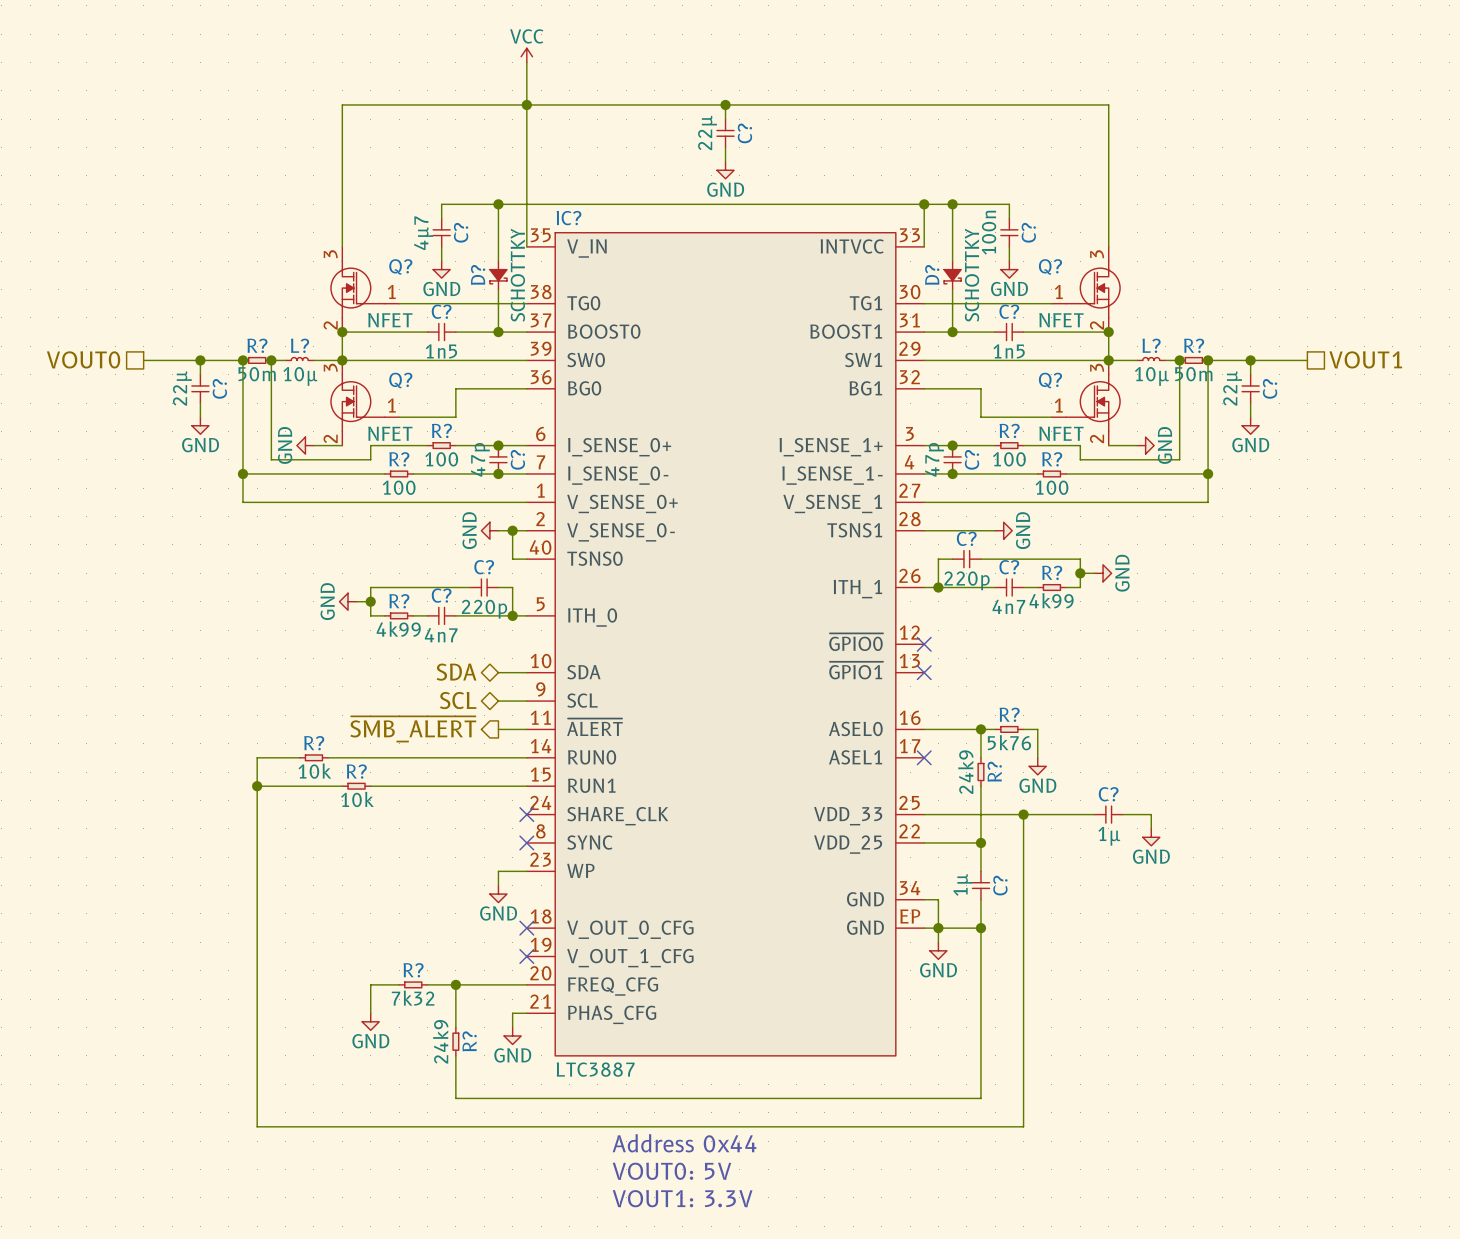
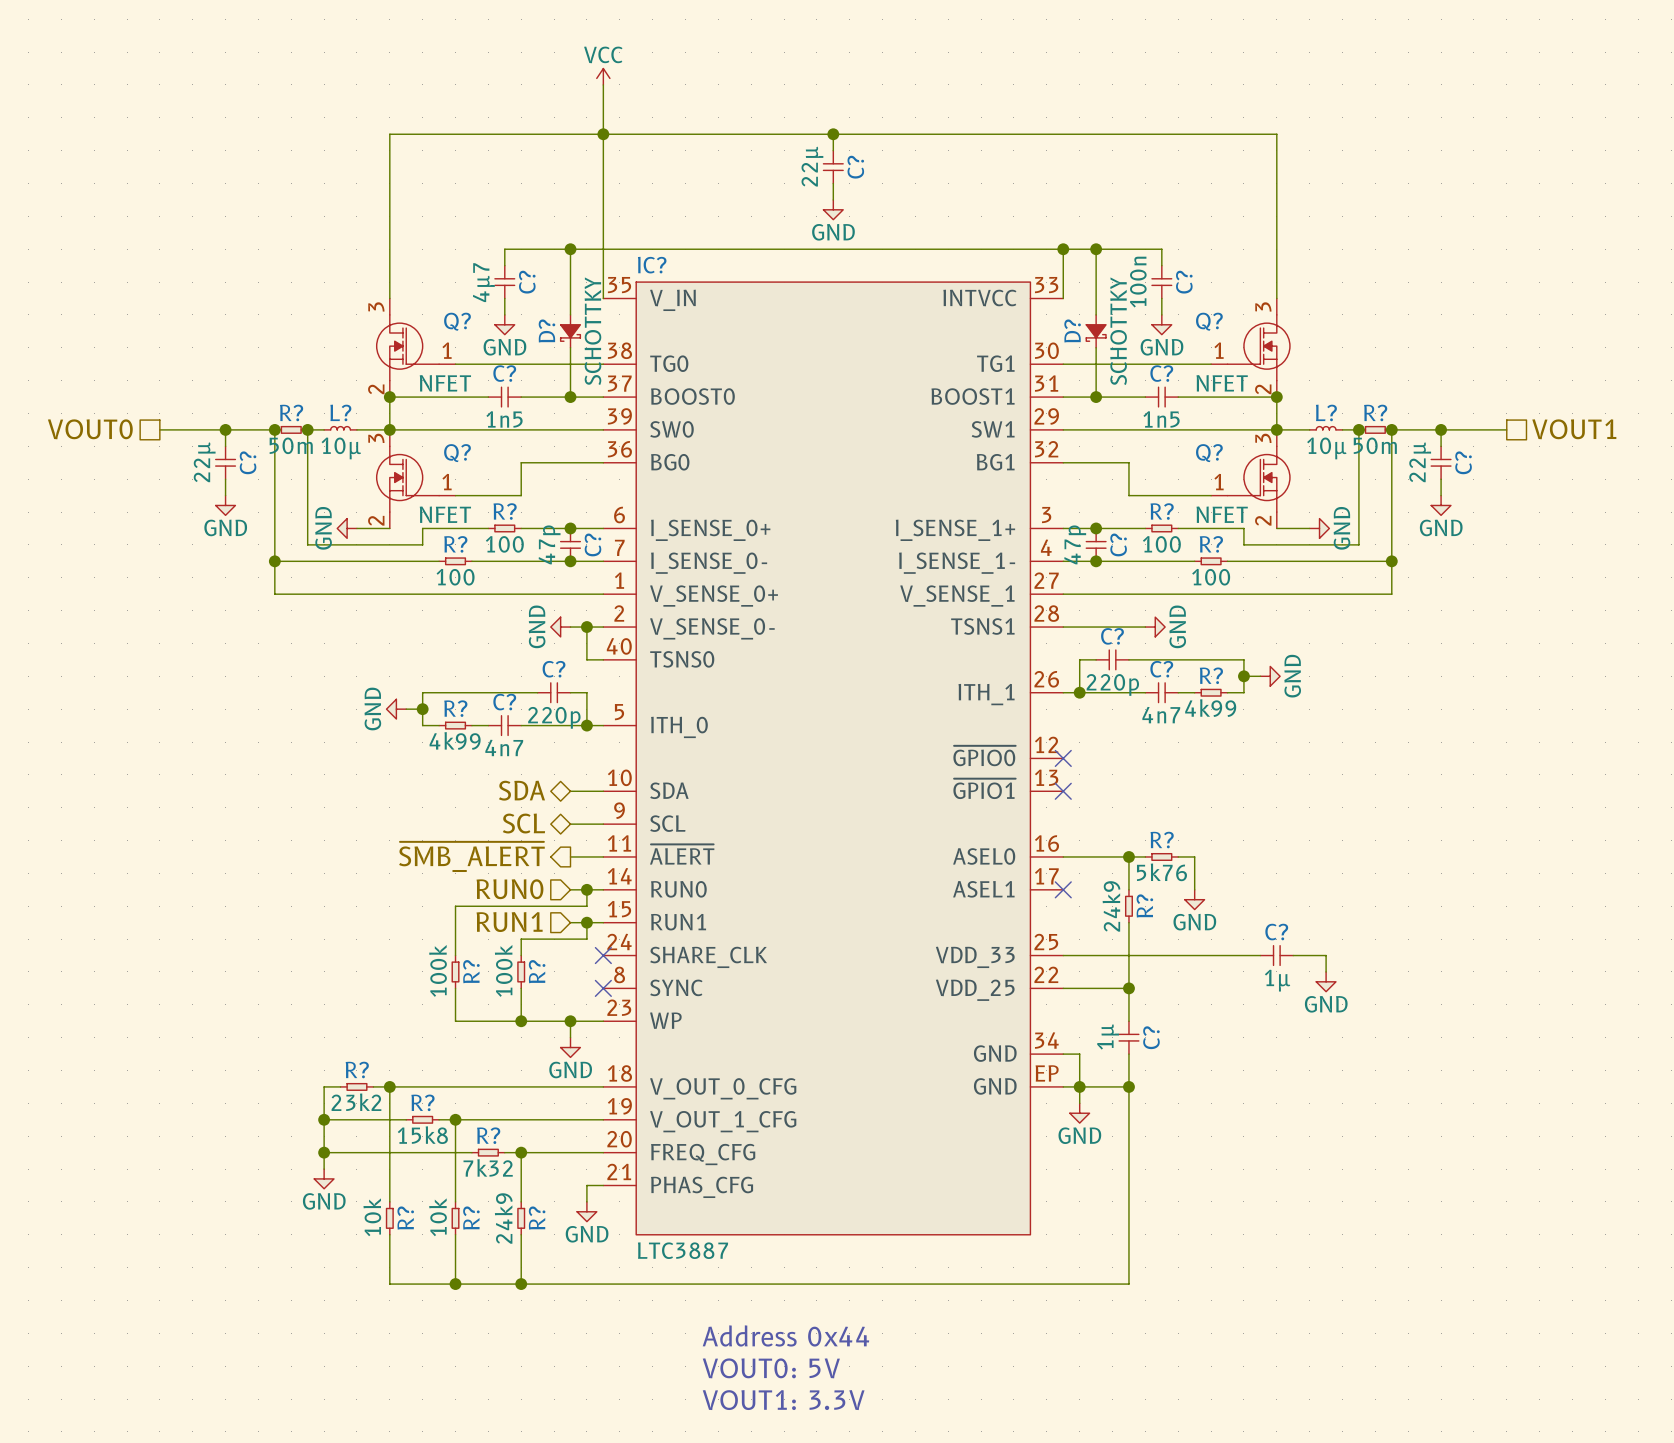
wire: (299, 757) (257, 757) (257, 1126) (1023, 1126) (1023, 814) -> none
R?: 10k (313, 757) -> none
wire: (328, 757) (498, 757) -> none
hierarchical label: none -> RUN0 (509, 889)
wire: none -> (586, 889) (586, 906) (455, 906) (455, 955)
junction: none -> (586, 889)
hierarchical label: none -> RUN1 (509, 922)
wire: (257, 786) (342, 786) -> none
junction: (257, 786) -> none
R?: 10k (356, 786) -> none
wire: (370, 786) (498, 786) -> none
wire: none -> (586, 922) (586, 939) (521, 939) (521, 955)
junction: none -> (586, 922)
junction: (1023, 814) -> none
R?: none -> 100k (455, 971)
R?: none -> 100k (521, 971)
wire: none -> (455, 988) (455, 1021) (570, 1021)
wire: none -> (521, 988) (521, 1021)
junction: none -> (521, 1021)
junction: none -> (570, 1021)
wire: none -> (340, 1086) (324, 1086) (324, 1169)
R?: none -> 23k2 (356, 1086)
wire: none -> (373, 1086) (603, 1086)
wire: none -> (389, 1086) (389, 1201)
junction: none -> (389, 1086)
no-connect mark: (526, 928) -> none
wire: none -> (324, 1119) (406, 1119)
junction: none -> (324, 1119)
R?: none -> 15k8 (422, 1119)
wire: none -> (439, 1119) (603, 1119)
wire: none -> (455, 1119) (455, 1201)
junction: none -> (455, 1119)
no-connect mark: (526, 956) -> none
junction: none -> (324, 1152)
wire: (370, 984) (370, 1013) -> (422, 1152) (324, 1152)
R? position: (413, 984) -> (488, 1152)
power symbol position: GND (370, 1021) -> GND (324, 1178)
R?: none -> 10k (389, 1218)
R?: none -> 10k (455, 1218)
wire: none -> (389, 1234) (389, 1284) (521, 1284)
wire: none -> (455, 1234) (455, 1284)
junction: none -> (455, 1284)
junction: none -> (521, 1284)

